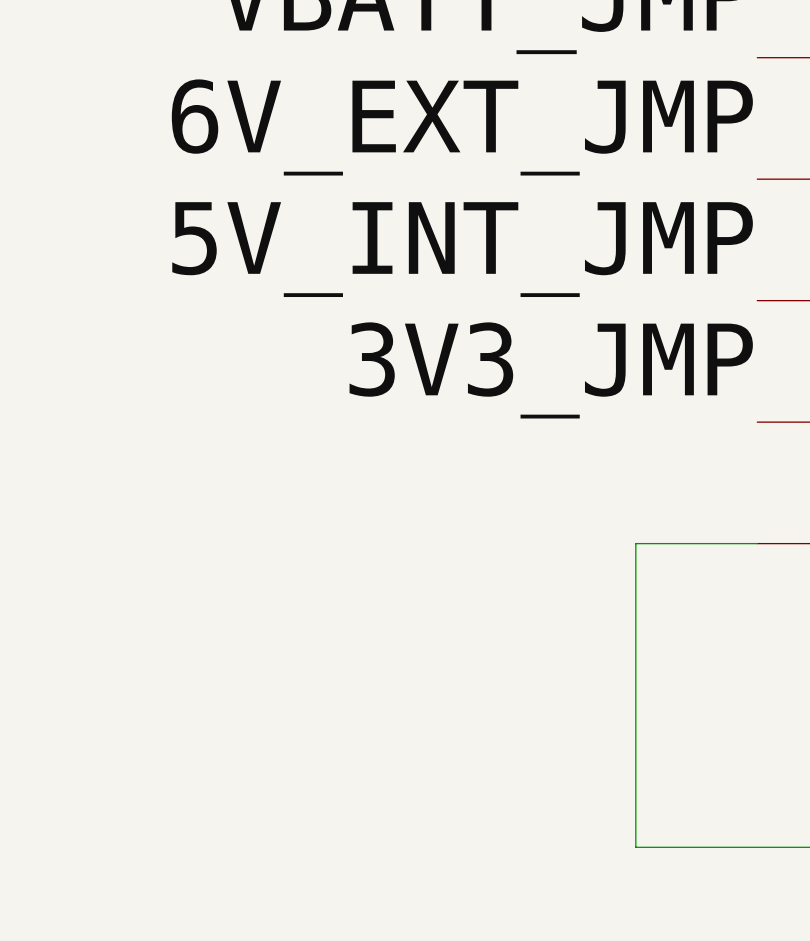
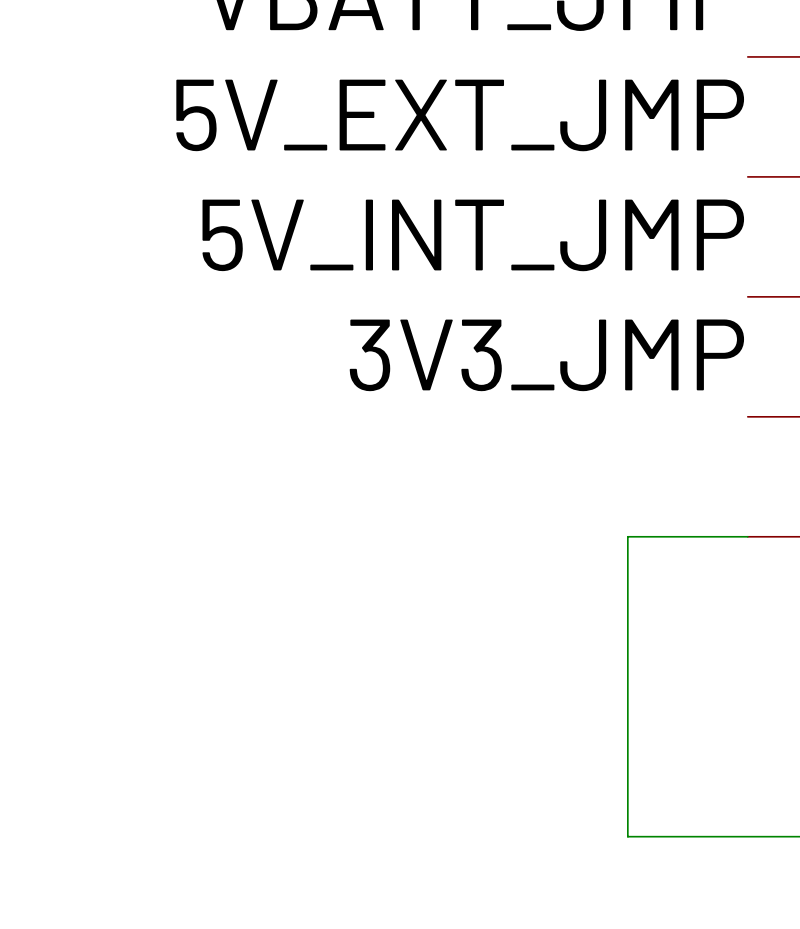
label: 6V_EXT_JMP (462, 127) -> 5V_EXT_JMP (460, 115)

